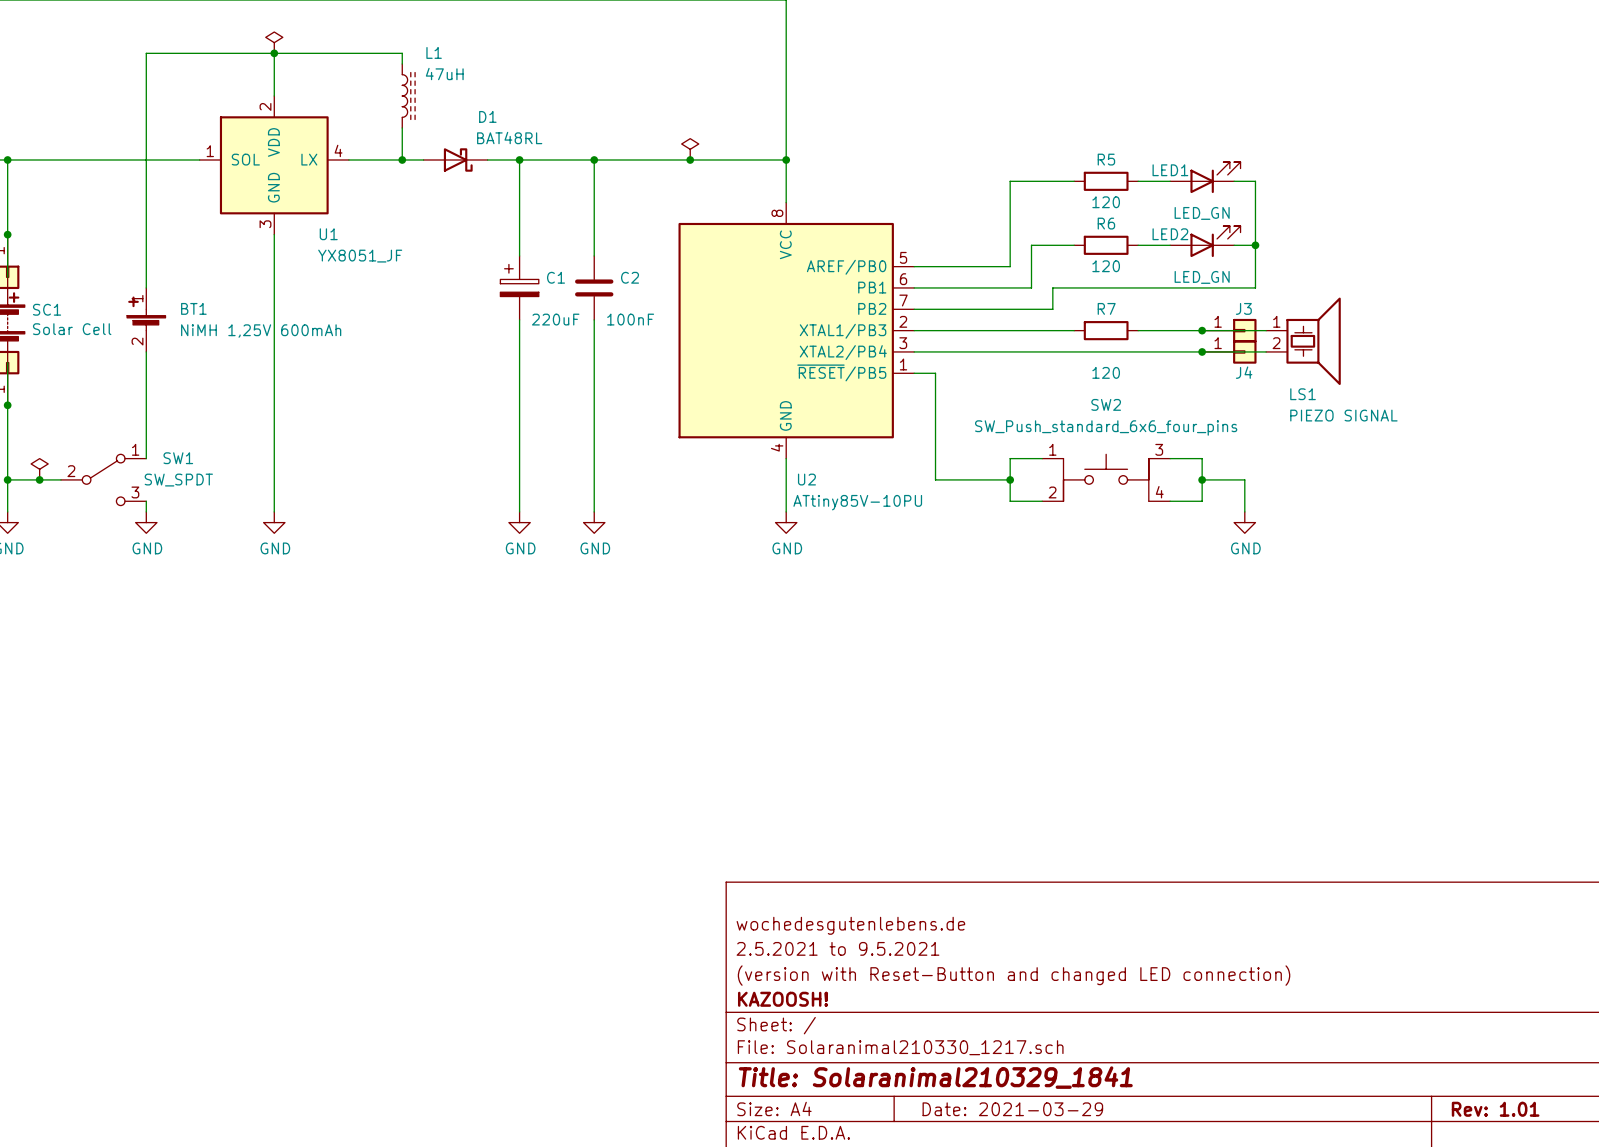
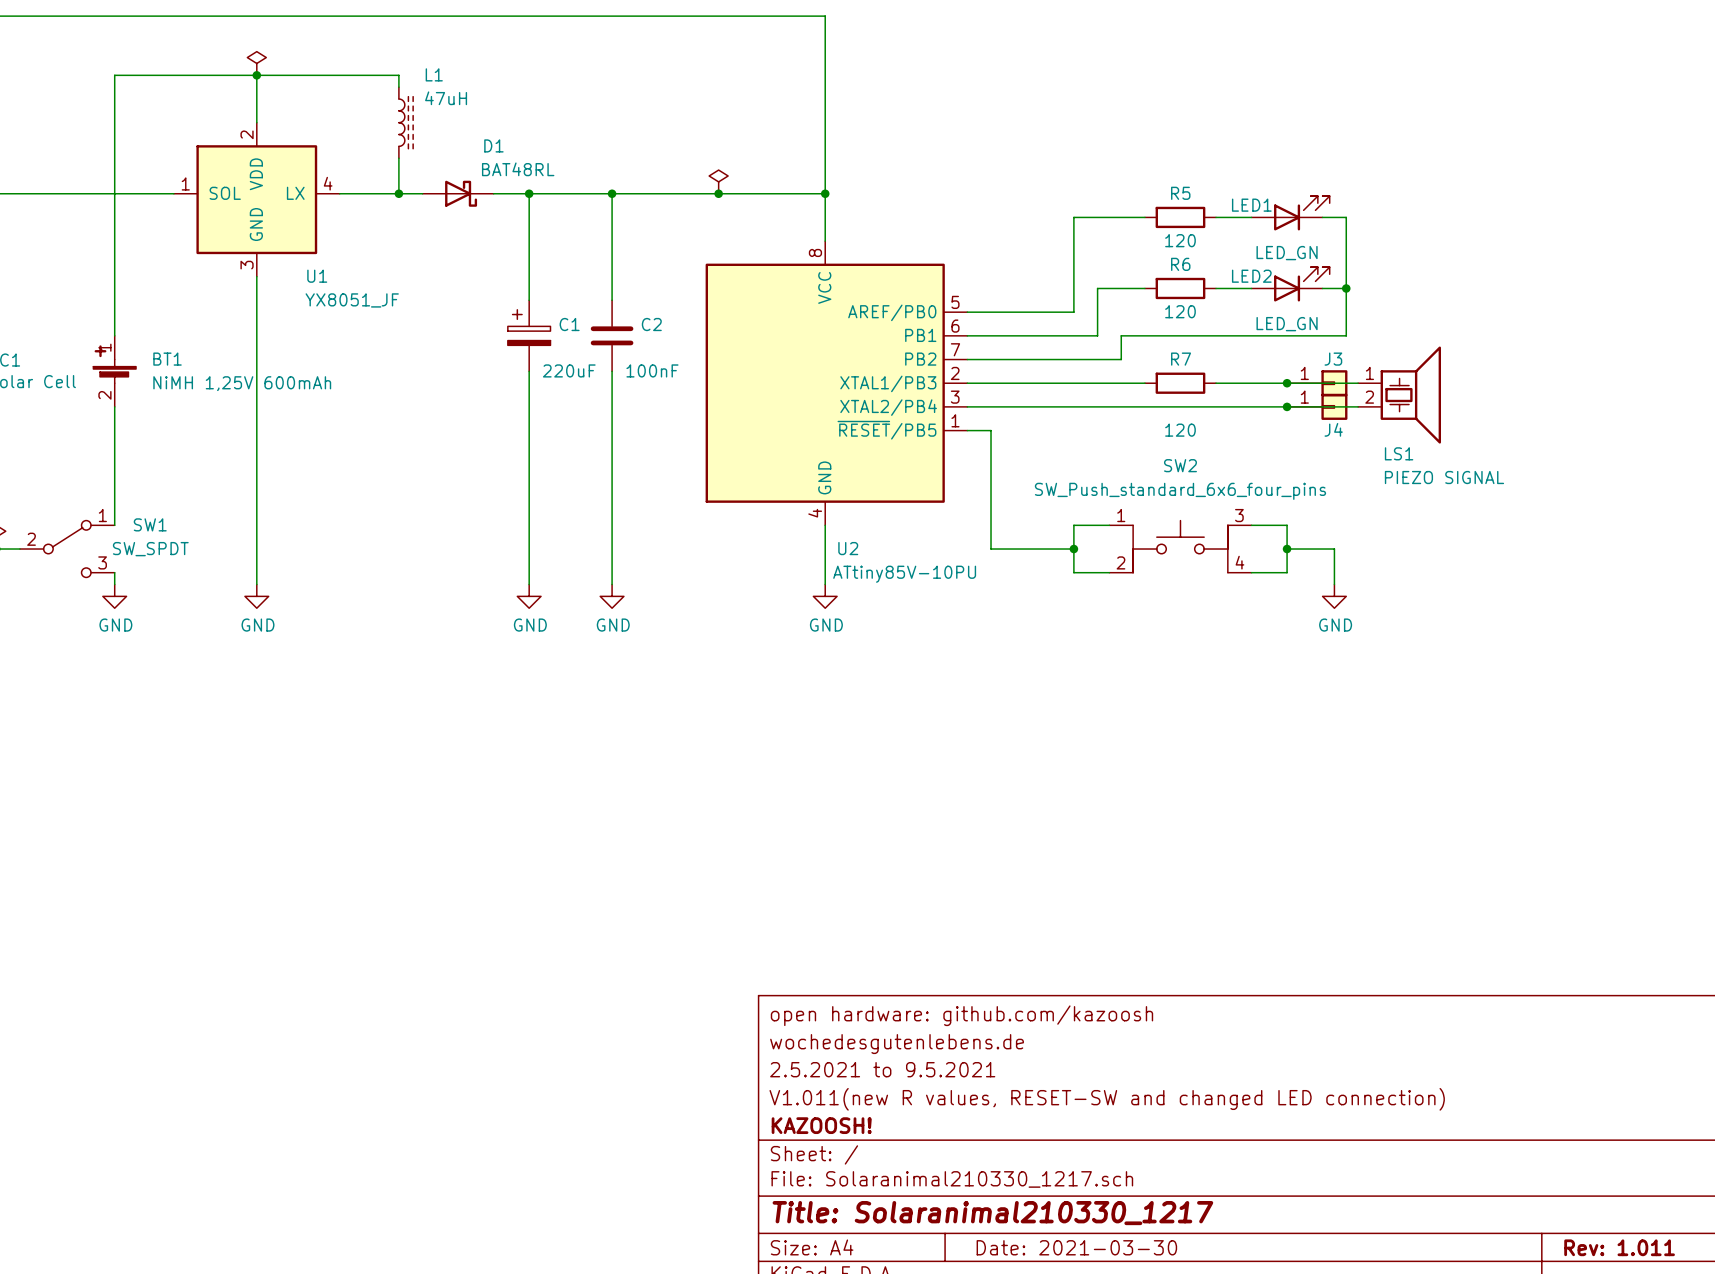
title block: none -> open hardware: github.com/kazoosh (961, 1015)
title block: (version with Reset-Button and changed LED connection) (1014, 975) -> V1.011(new R values, RESET-SW and changed LED connection) (1107, 1099)
title block: Title: Solaranimal210329_1841 (935, 1077) -> Title: Solaranimal210330_1217 (992, 1213)
title block: Date: 2021-03-29 (1012, 1109) -> Date: 2021-03-30 (1076, 1247)
title block: Rev: 1.01 (1495, 1109) -> Rev: 1.011 (1619, 1247)

